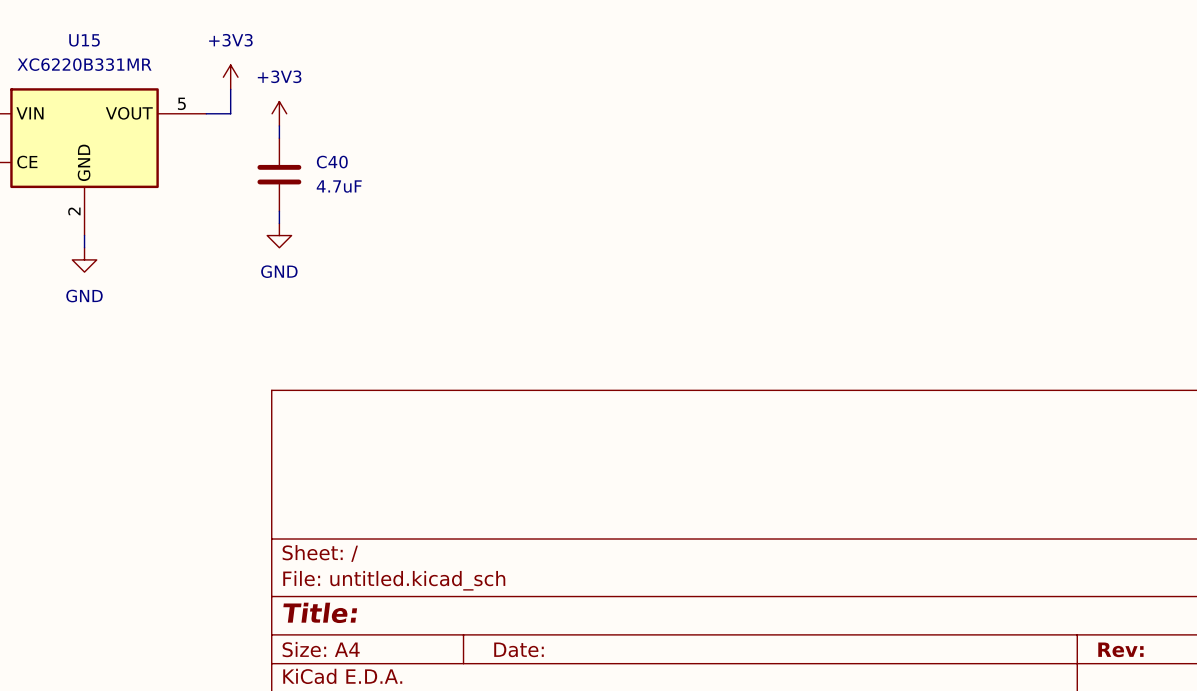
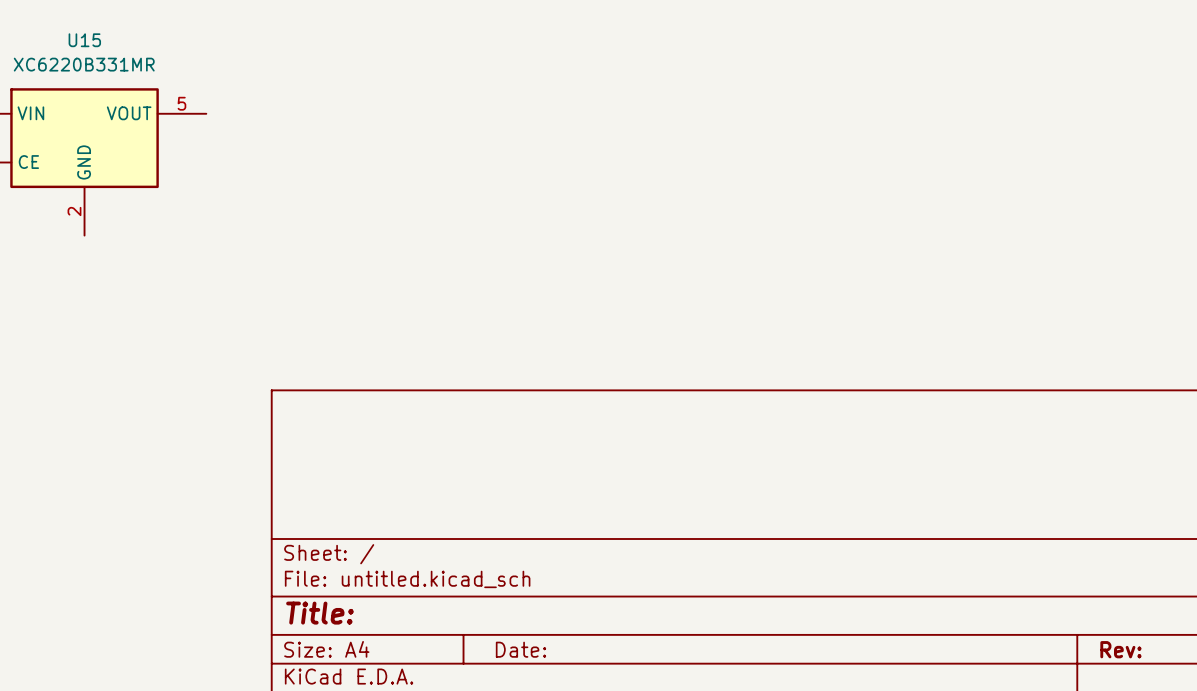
power symbol: +3V3 (230, 77) -> none
wire: (230, 89) (230, 113) (206, 113) -> none
power symbol: +3V3 (279, 113) -> none
wire: (279, 125) (279, 138) -> none
C40: 4.7uF (279, 174) -> none
wire: (279, 211) (279, 223) -> none
wire: (84, 235) (84, 247) -> none
power symbol: GND (279, 235) -> none
power symbol: GND (84, 259) -> none

